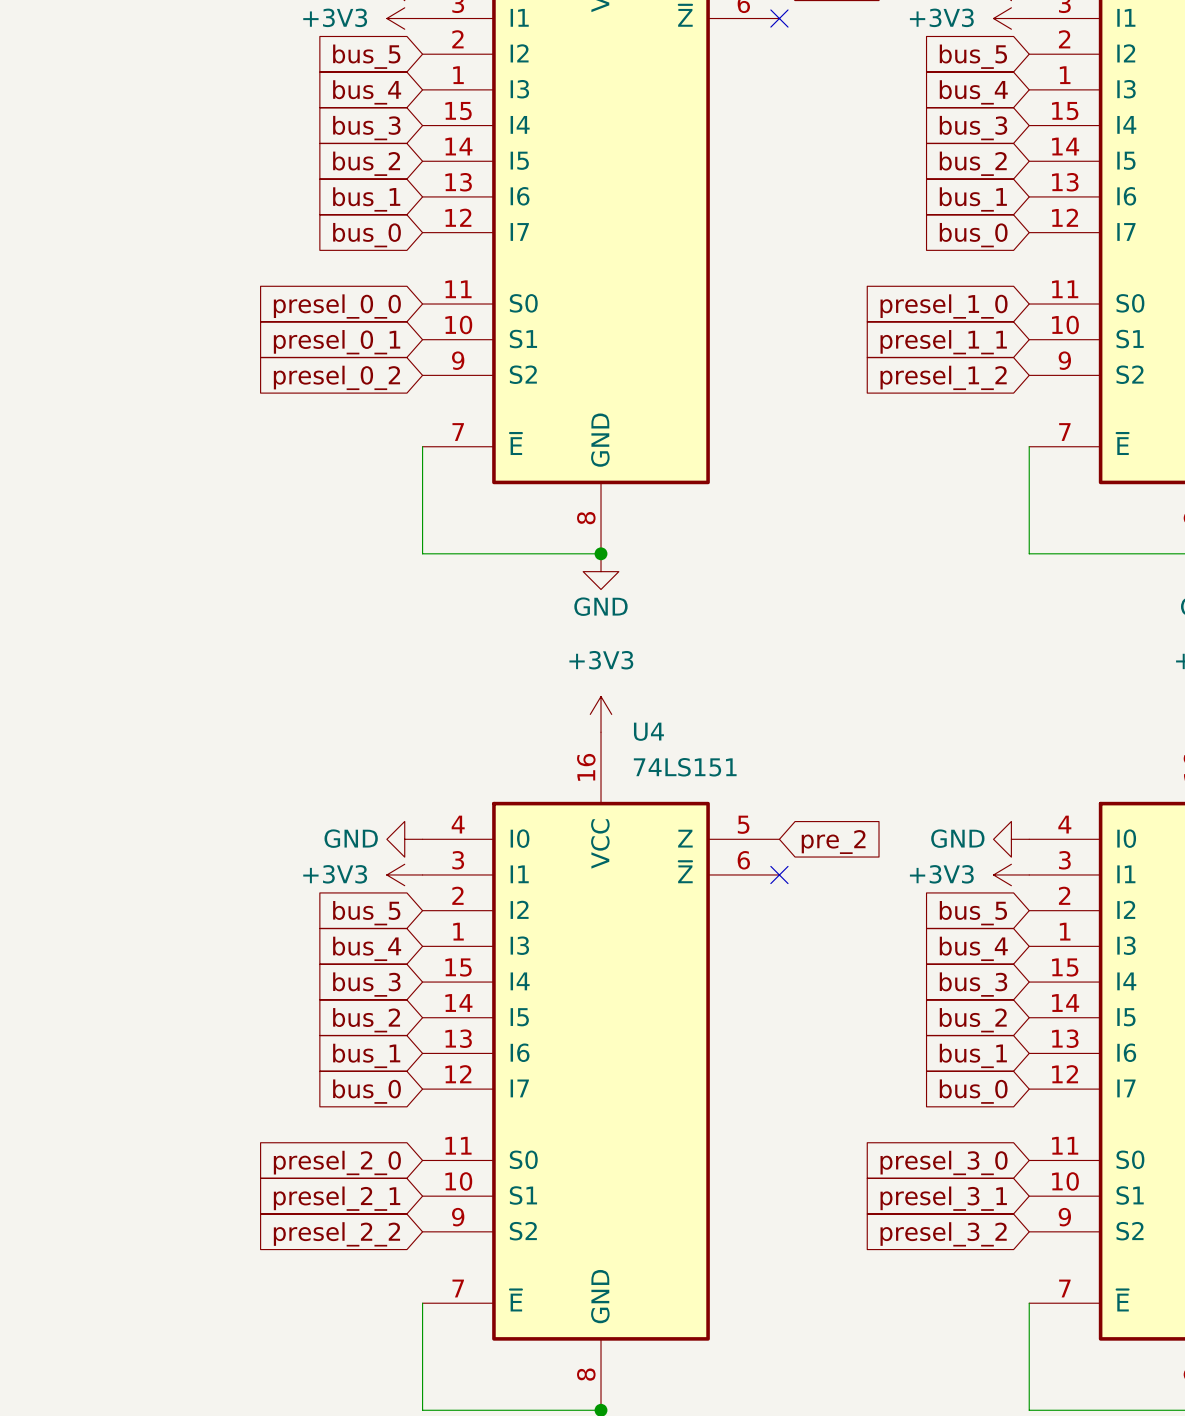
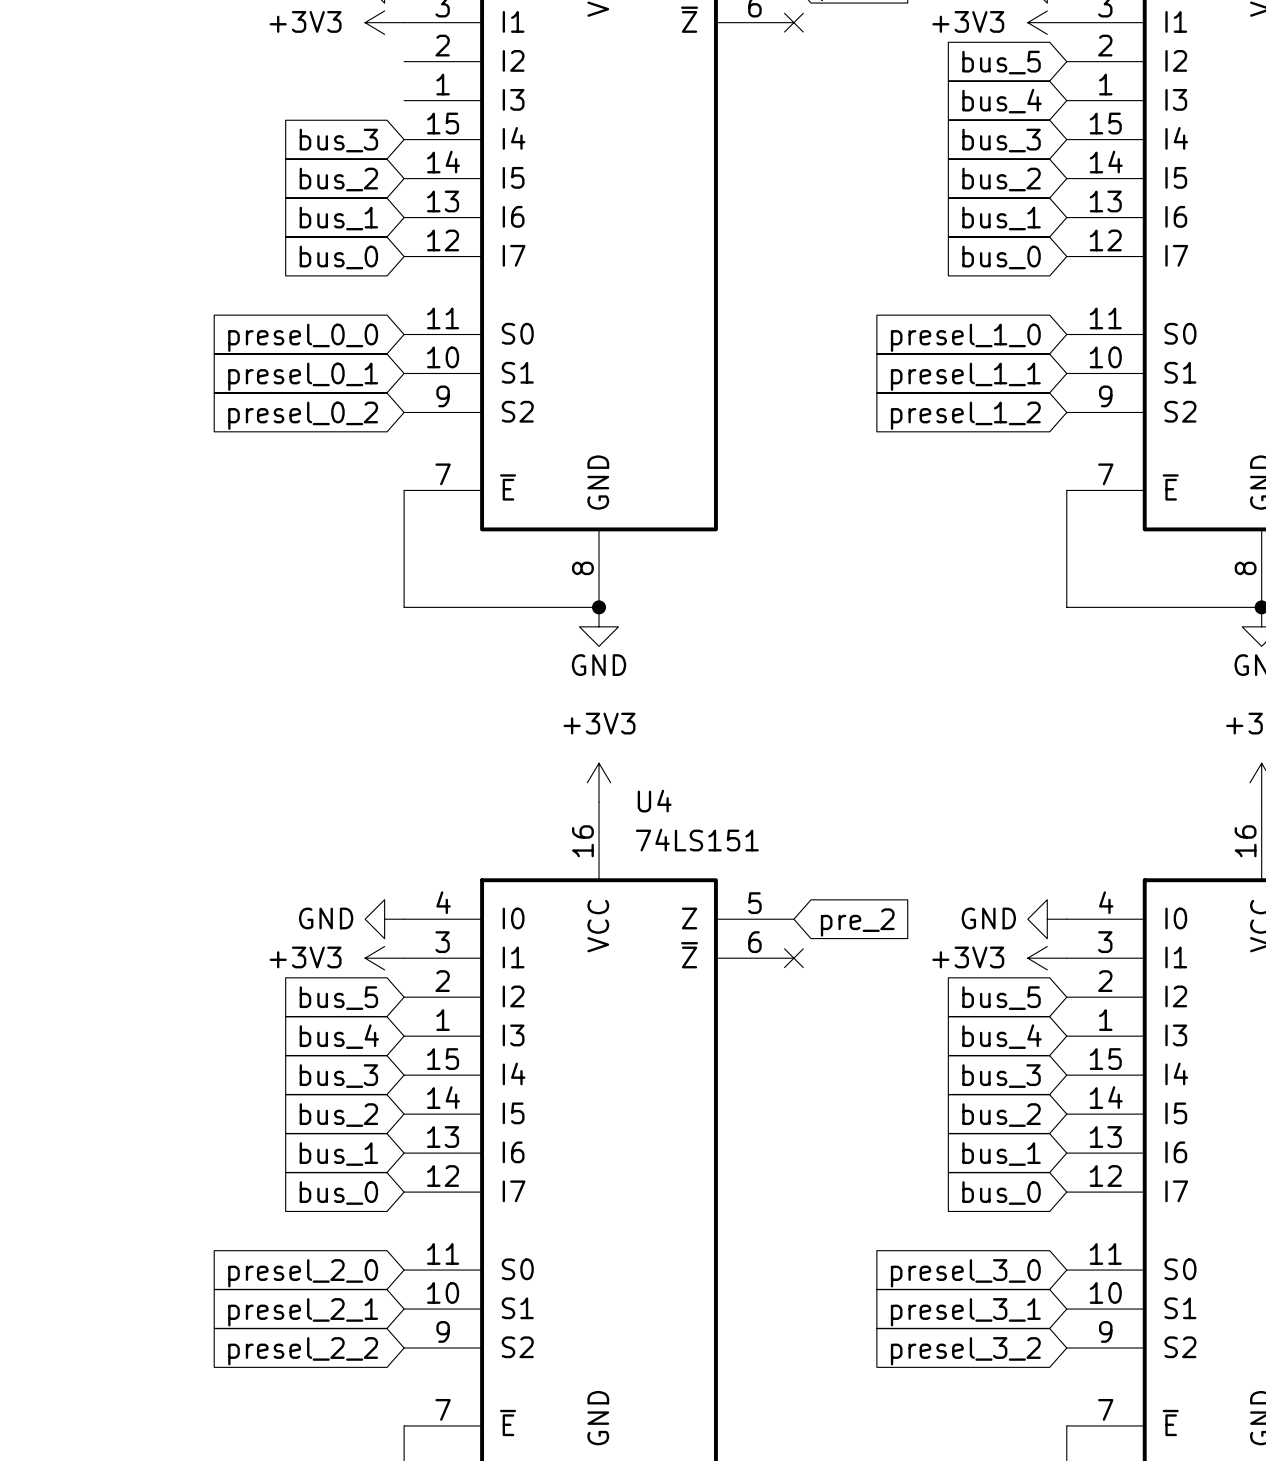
global label: bus_5 (366, 56) -> none
global label: bus_4 (367, 92) -> none

